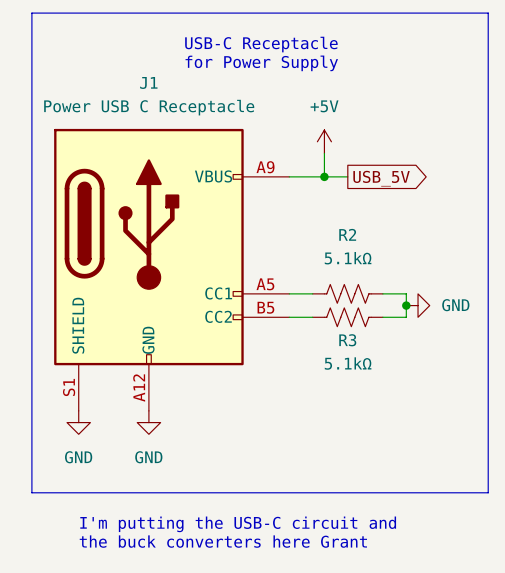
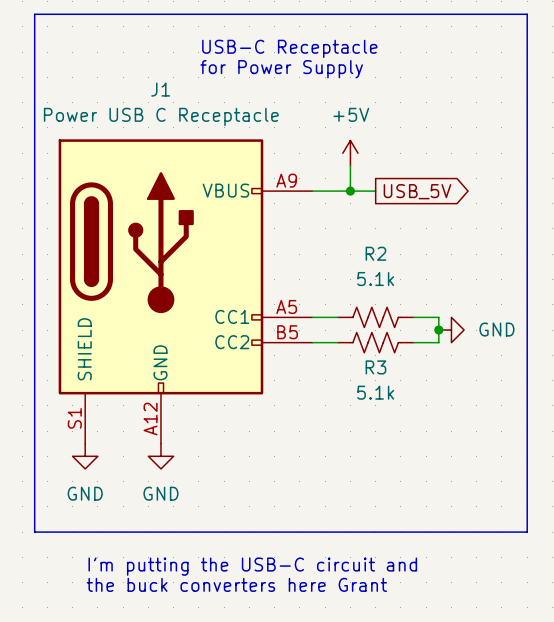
R2 value: 5.1kΩ (348, 258) -> 5.1k (375, 279)
R3 value: 5.1kΩ (348, 363) -> 5.1k (375, 392)

